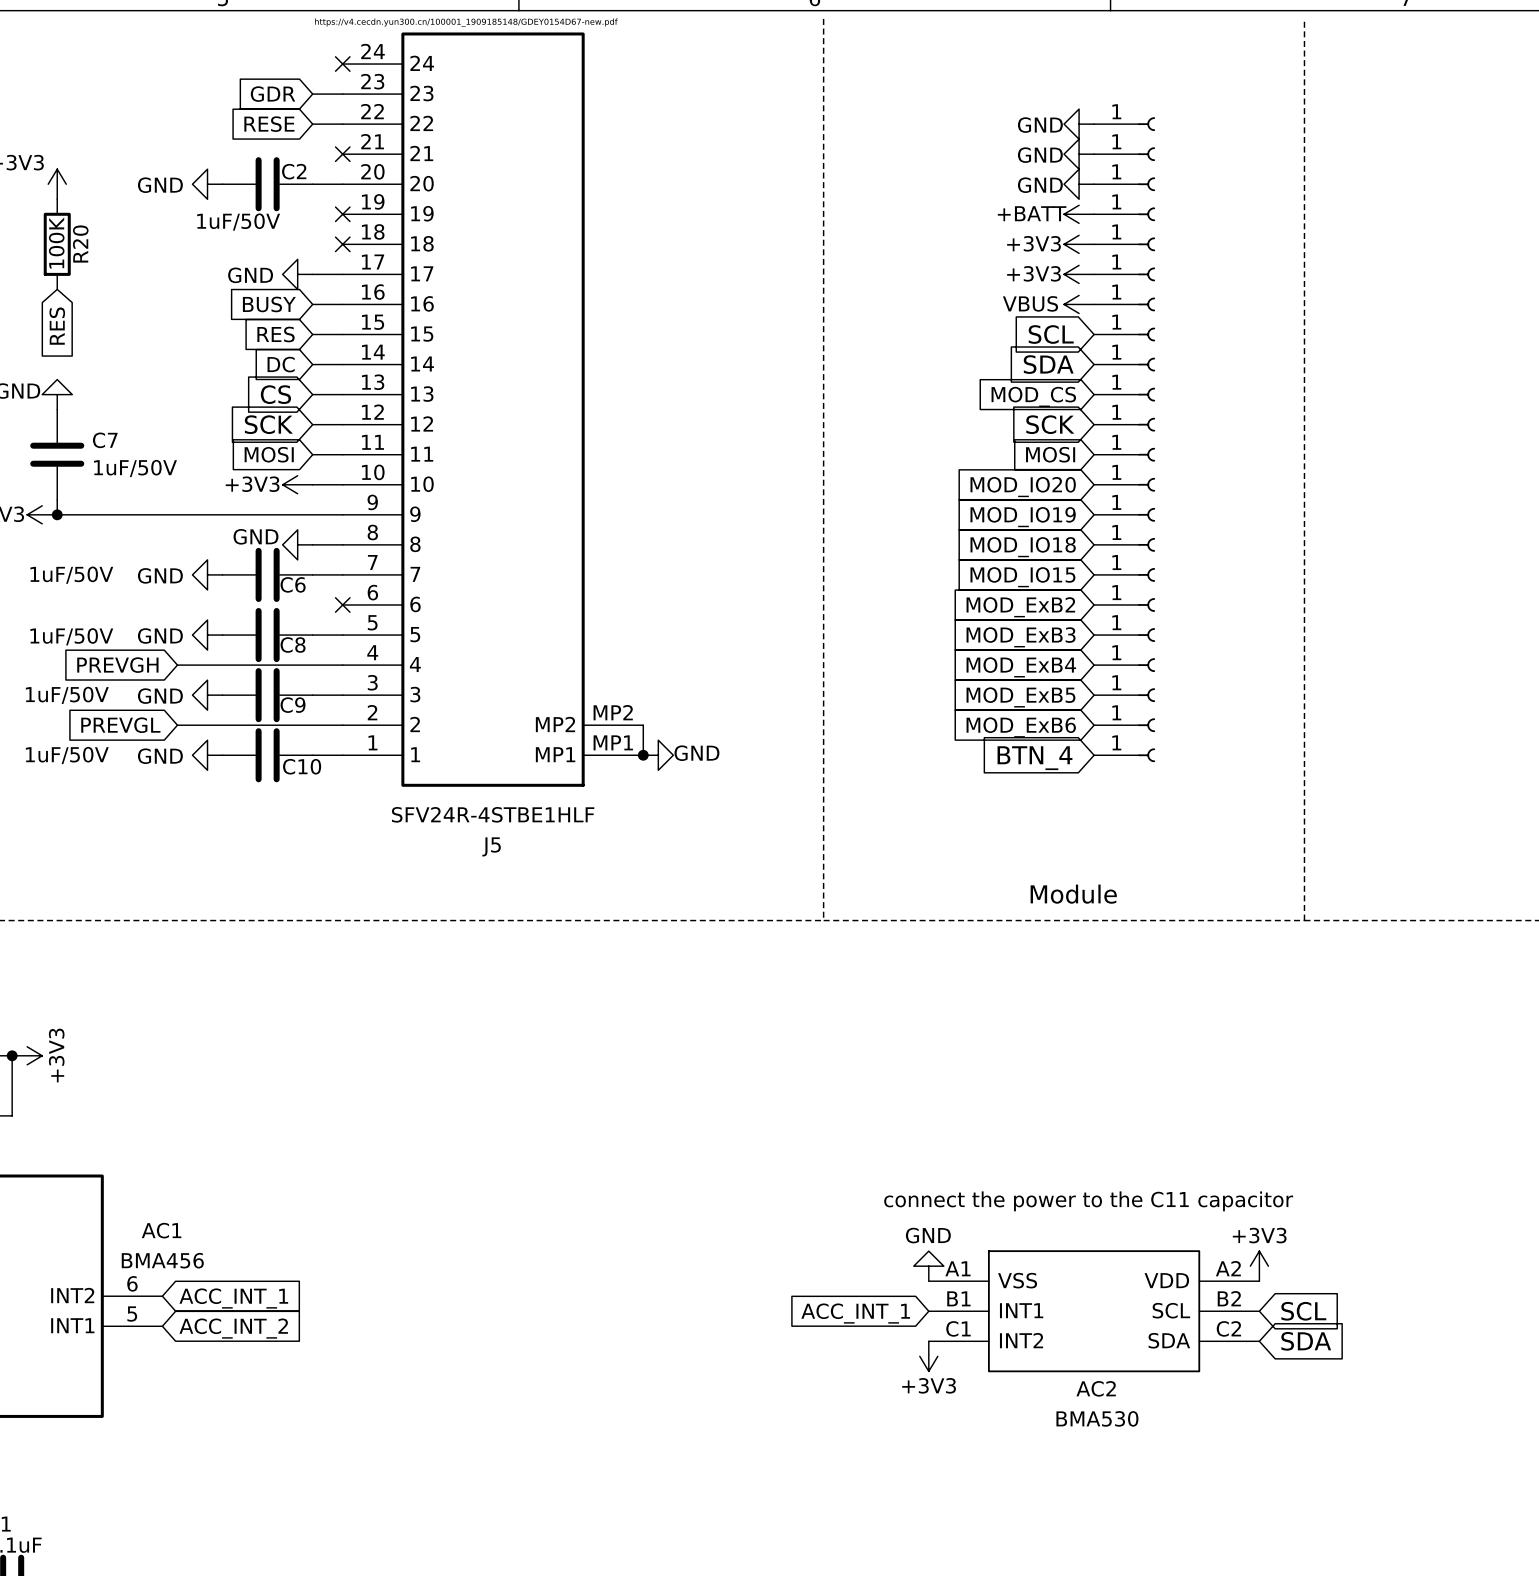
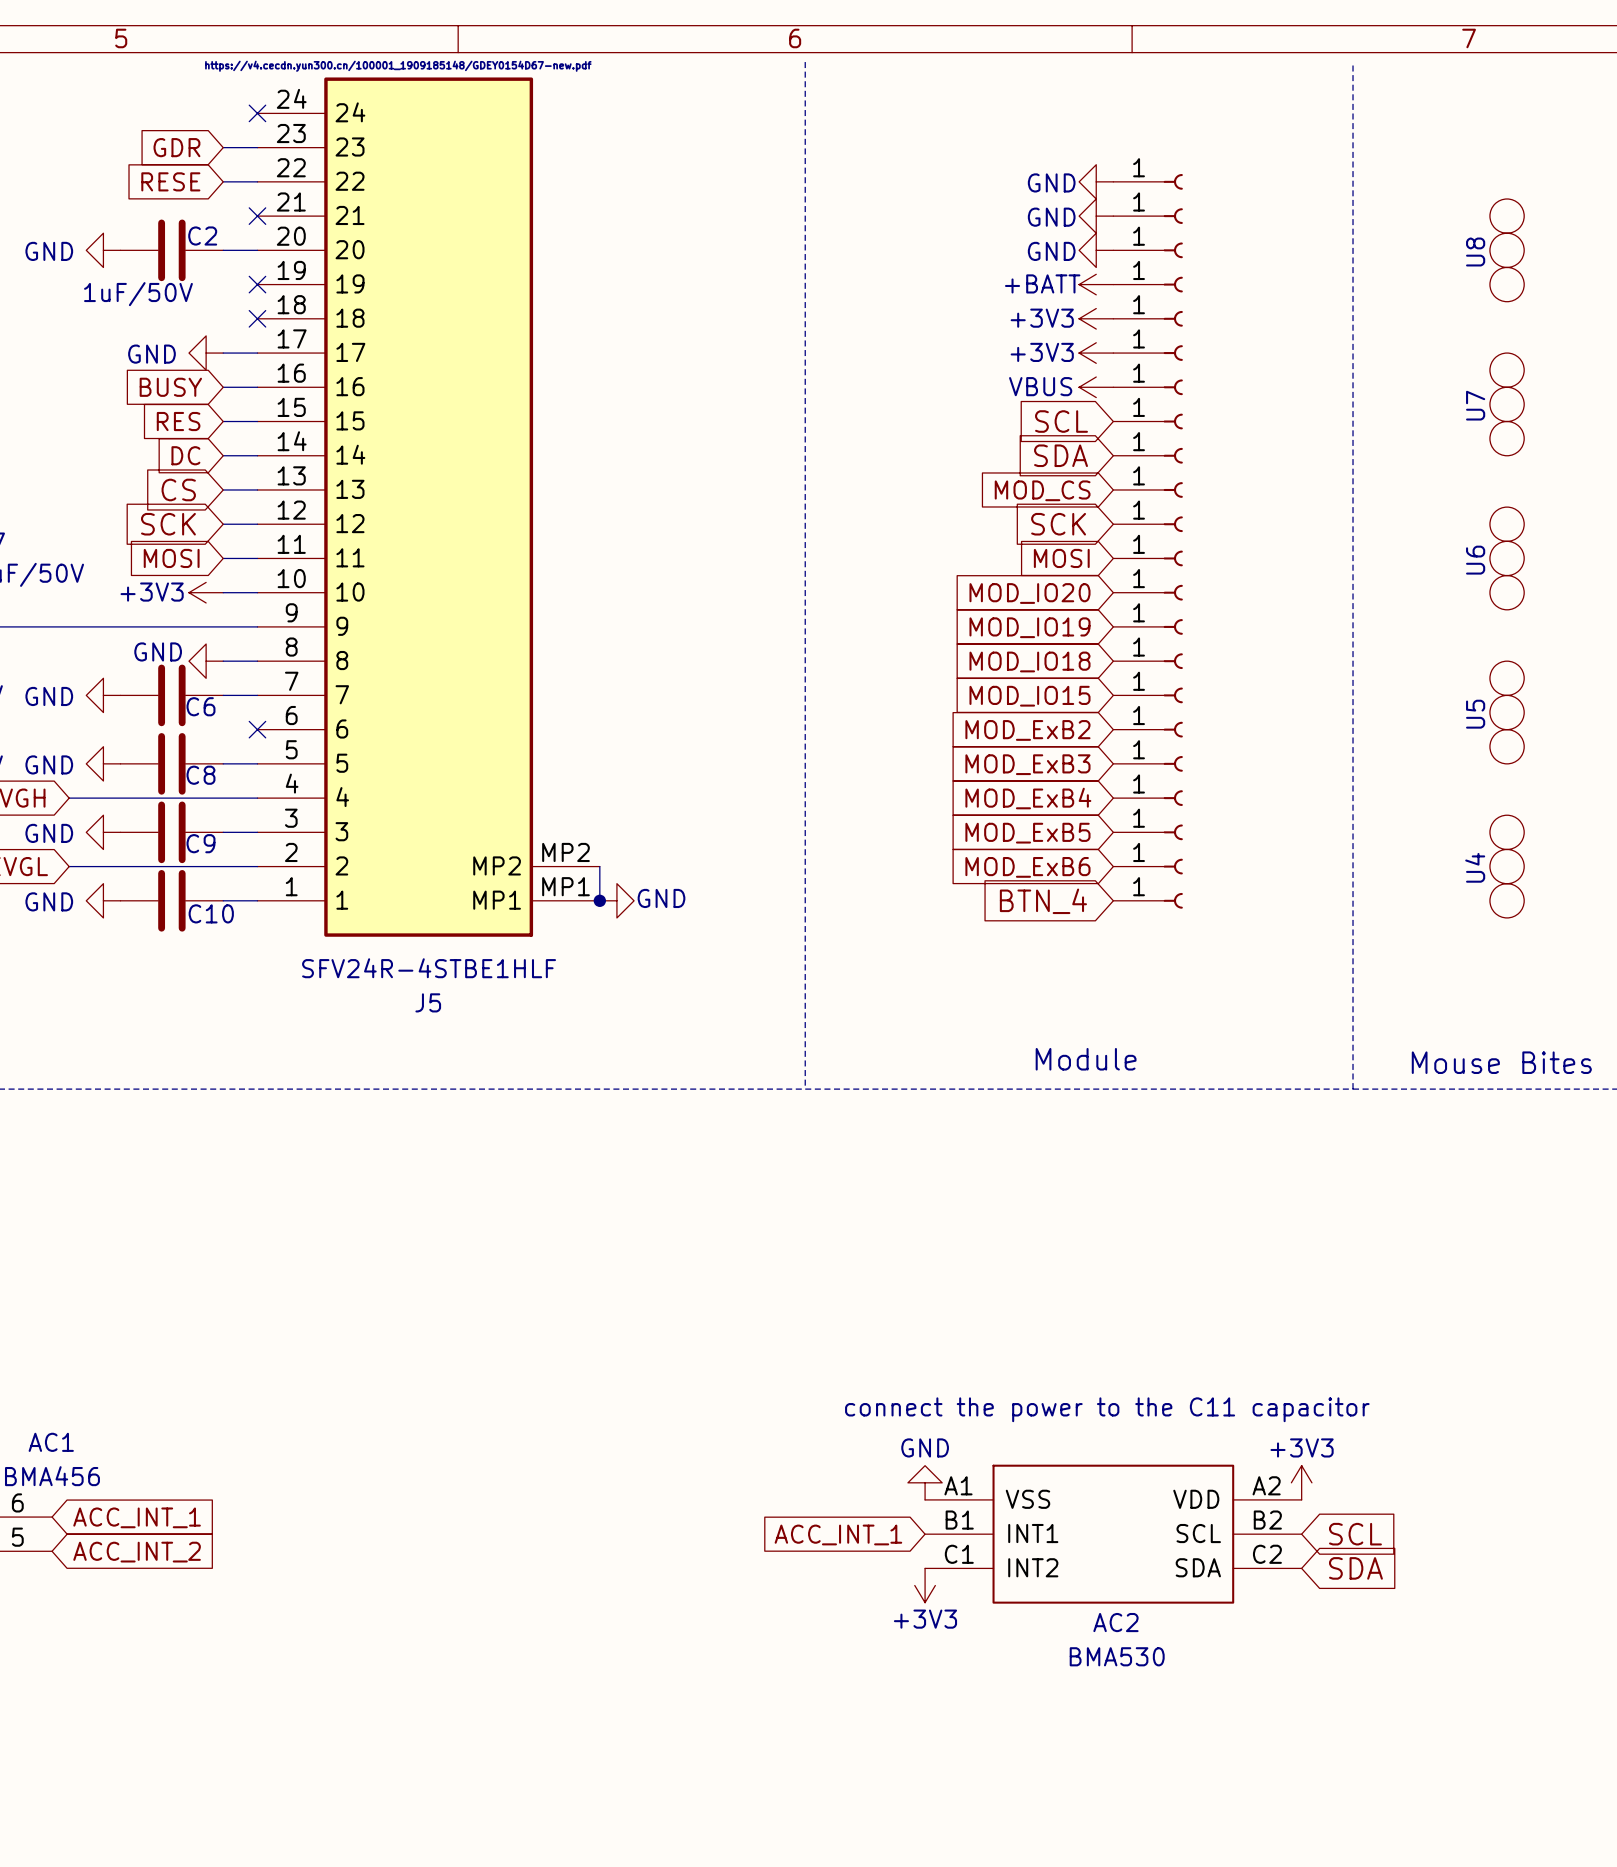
U8: none -> (1507, 250)
U7: none -> (1507, 404)
U6: none -> (1507, 558)
U5: none -> (1507, 712)
U4: none -> (1507, 866)
text: none -> Mouse Bites (1501, 1062)

